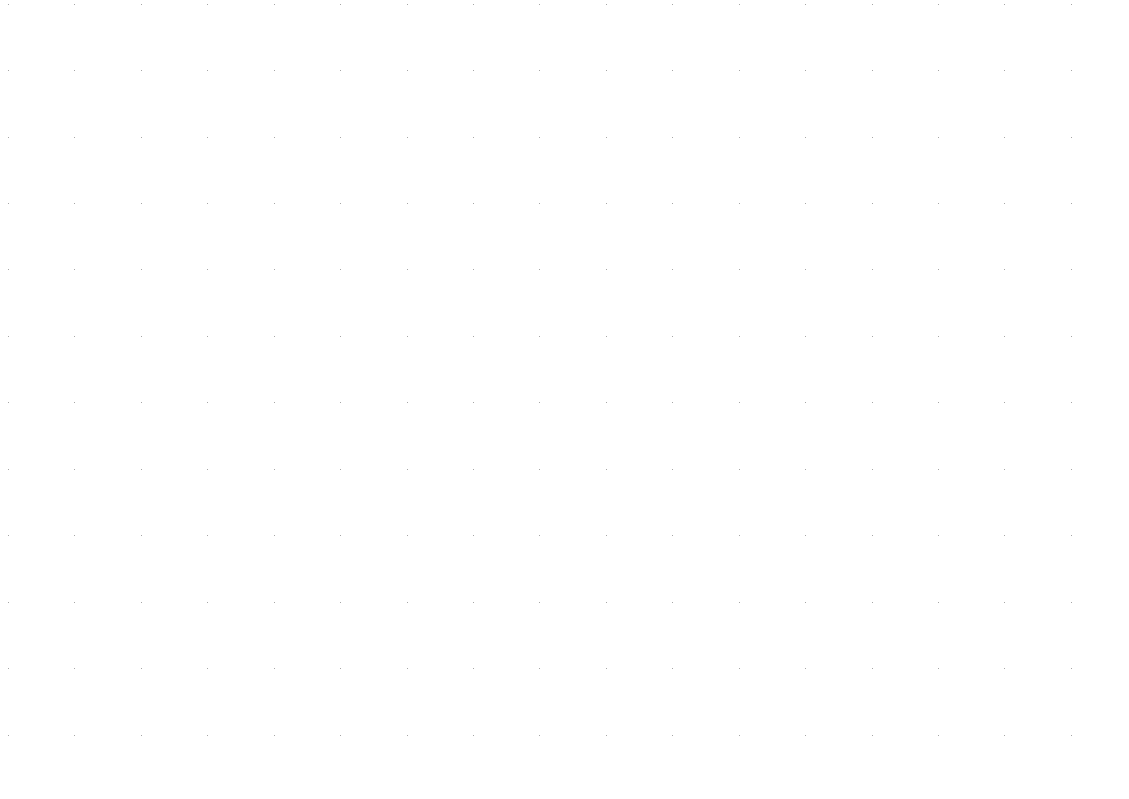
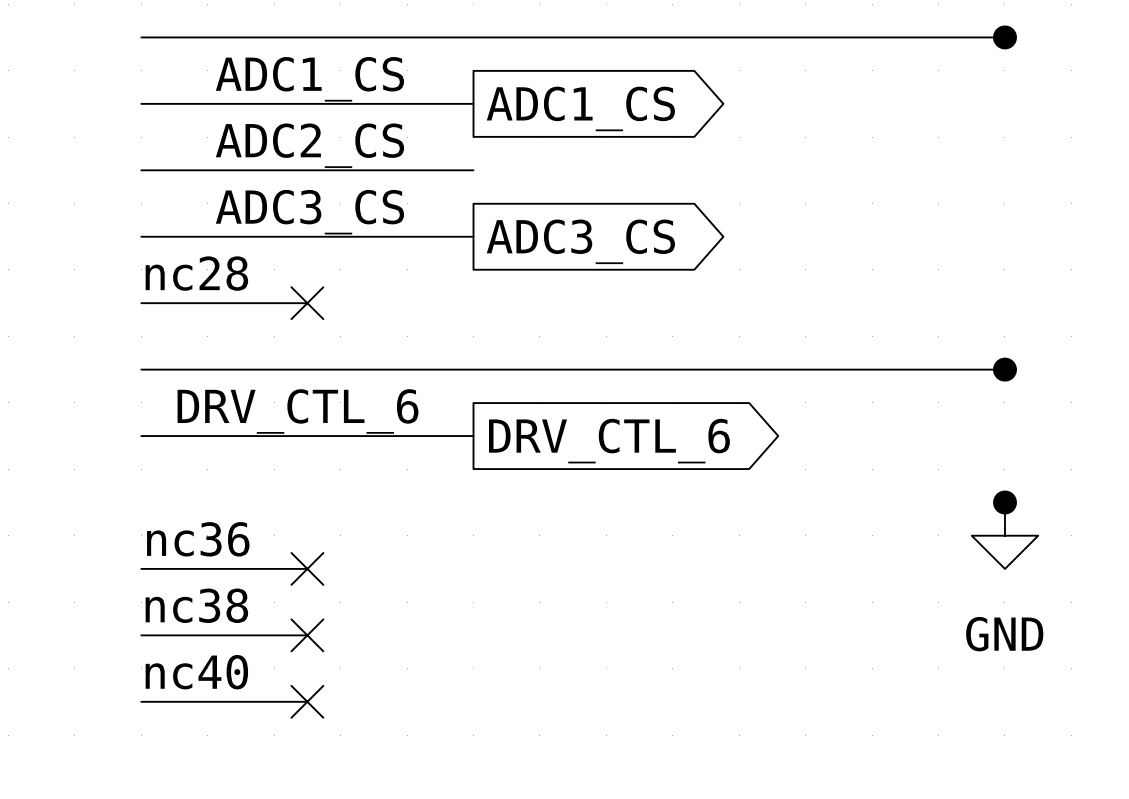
wire: none -> (141, 37) (1004, 37)
junction: none -> (1004, 37)
label: none -> ADC1_CS (309, 79)
wire: none -> (141, 103) (473, 103)
global label: none -> ADC1_CS (580, 108)
label: none -> ADC2_CS (309, 145)
wire: none -> (141, 170) (473, 170)
label: none -> ADC3_CS (309, 212)
wire: none -> (141, 236) (473, 236)
global label: none -> ADC3_CS (580, 241)
label: none -> nc28 (196, 273)
wire: none -> (141, 303) (307, 303)
no-connect mark: none -> (307, 303)
wire: none -> (141, 369) (1004, 369)
junction: none -> (1004, 369)
label: none -> DRV_CTL_6 (298, 411)
wire: none -> (141, 436) (473, 436)
global label: none -> DRV_CTL_6 (609, 441)
junction: none -> (1004, 502)
power symbol: none -> GND (1004, 535)
label: none -> nc36 (198, 539)
wire: none -> (141, 568) (307, 568)
no-connect mark: none -> (307, 568)
label: none -> nc38 (196, 605)
wire: none -> (141, 635) (307, 635)
no-connect mark: none -> (307, 635)
label: none -> nc40 (196, 672)
wire: none -> (141, 701) (307, 701)
no-connect mark: none -> (307, 701)

